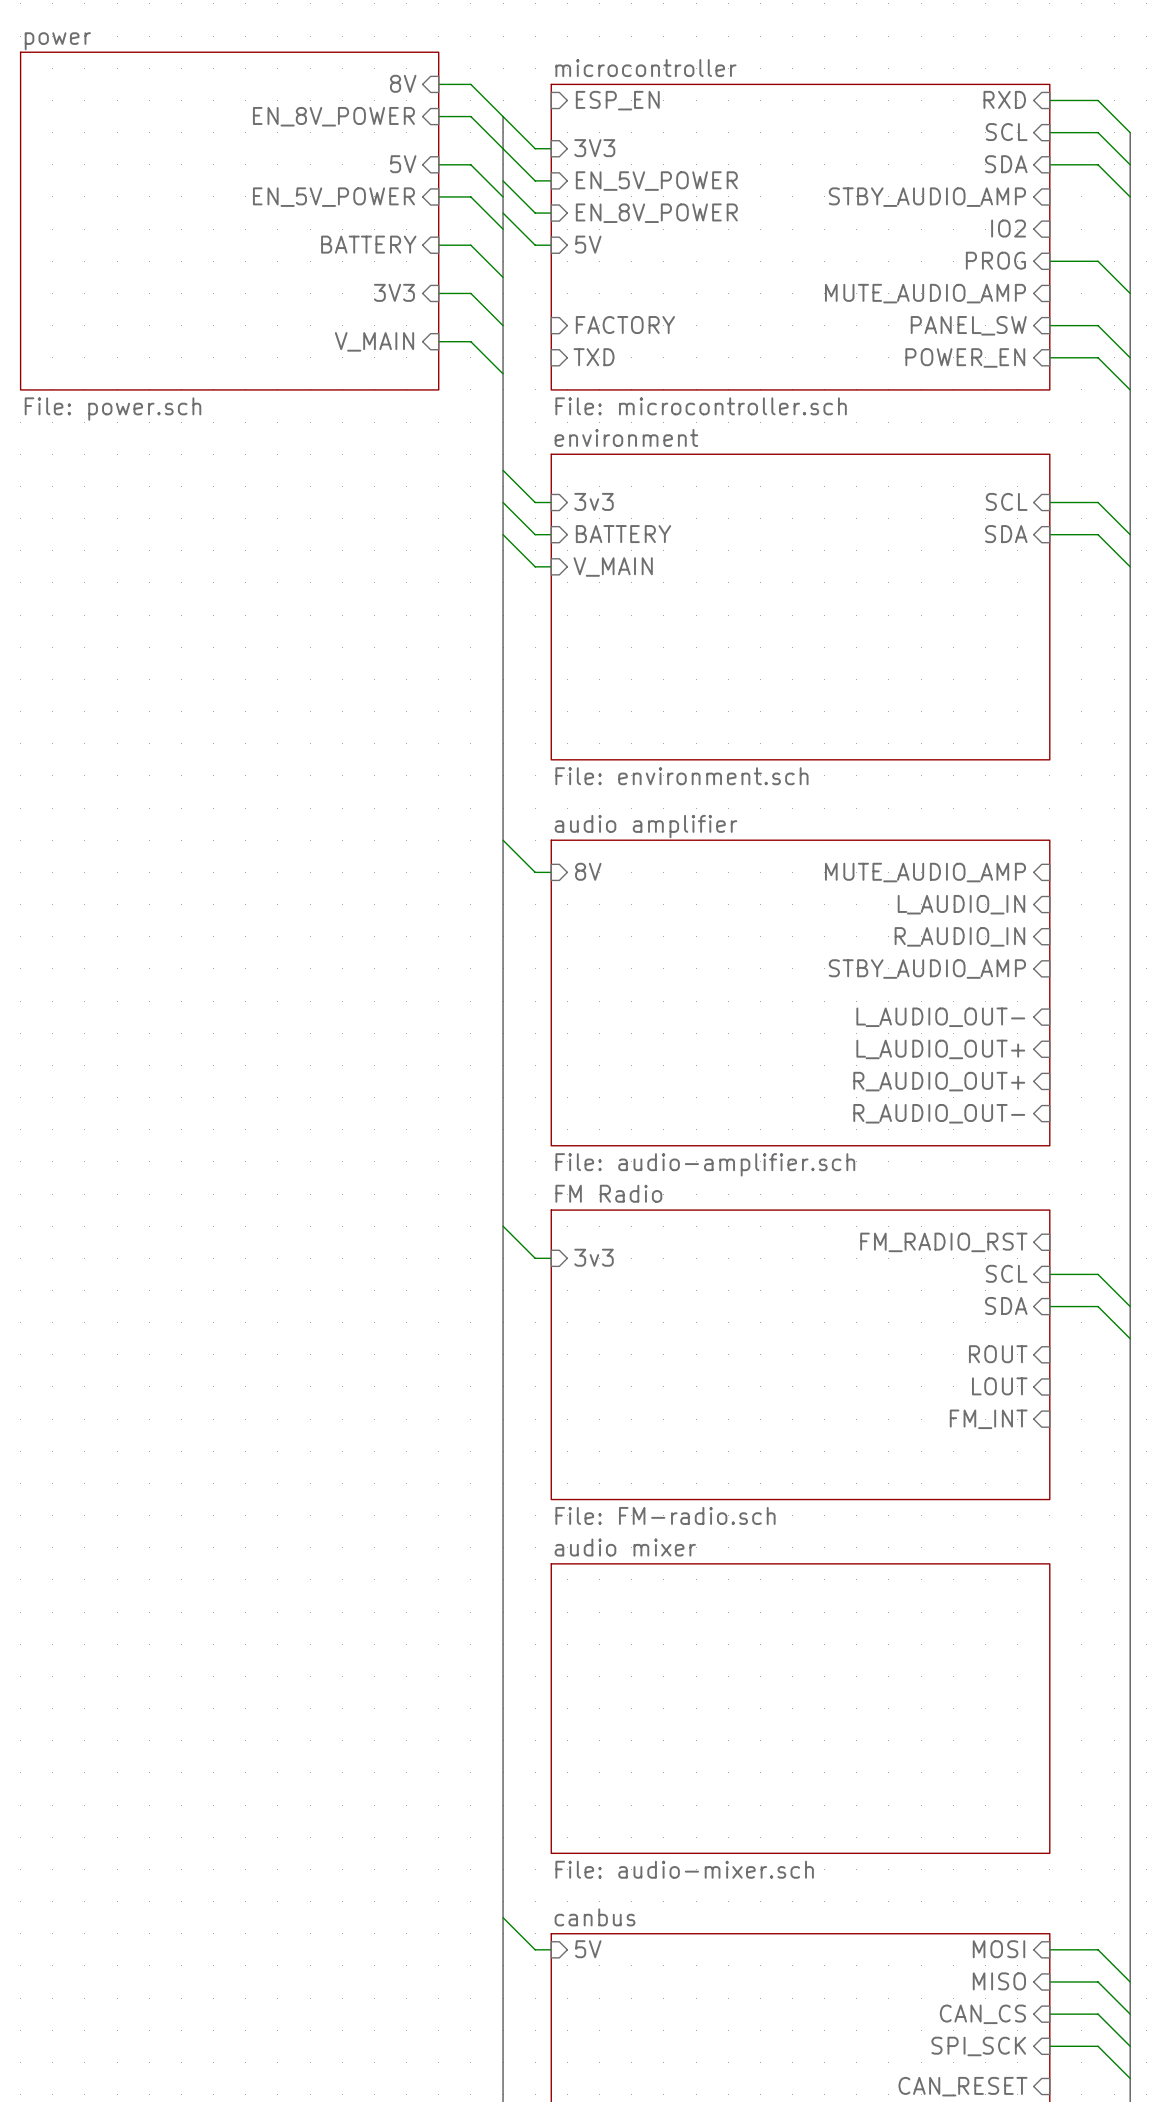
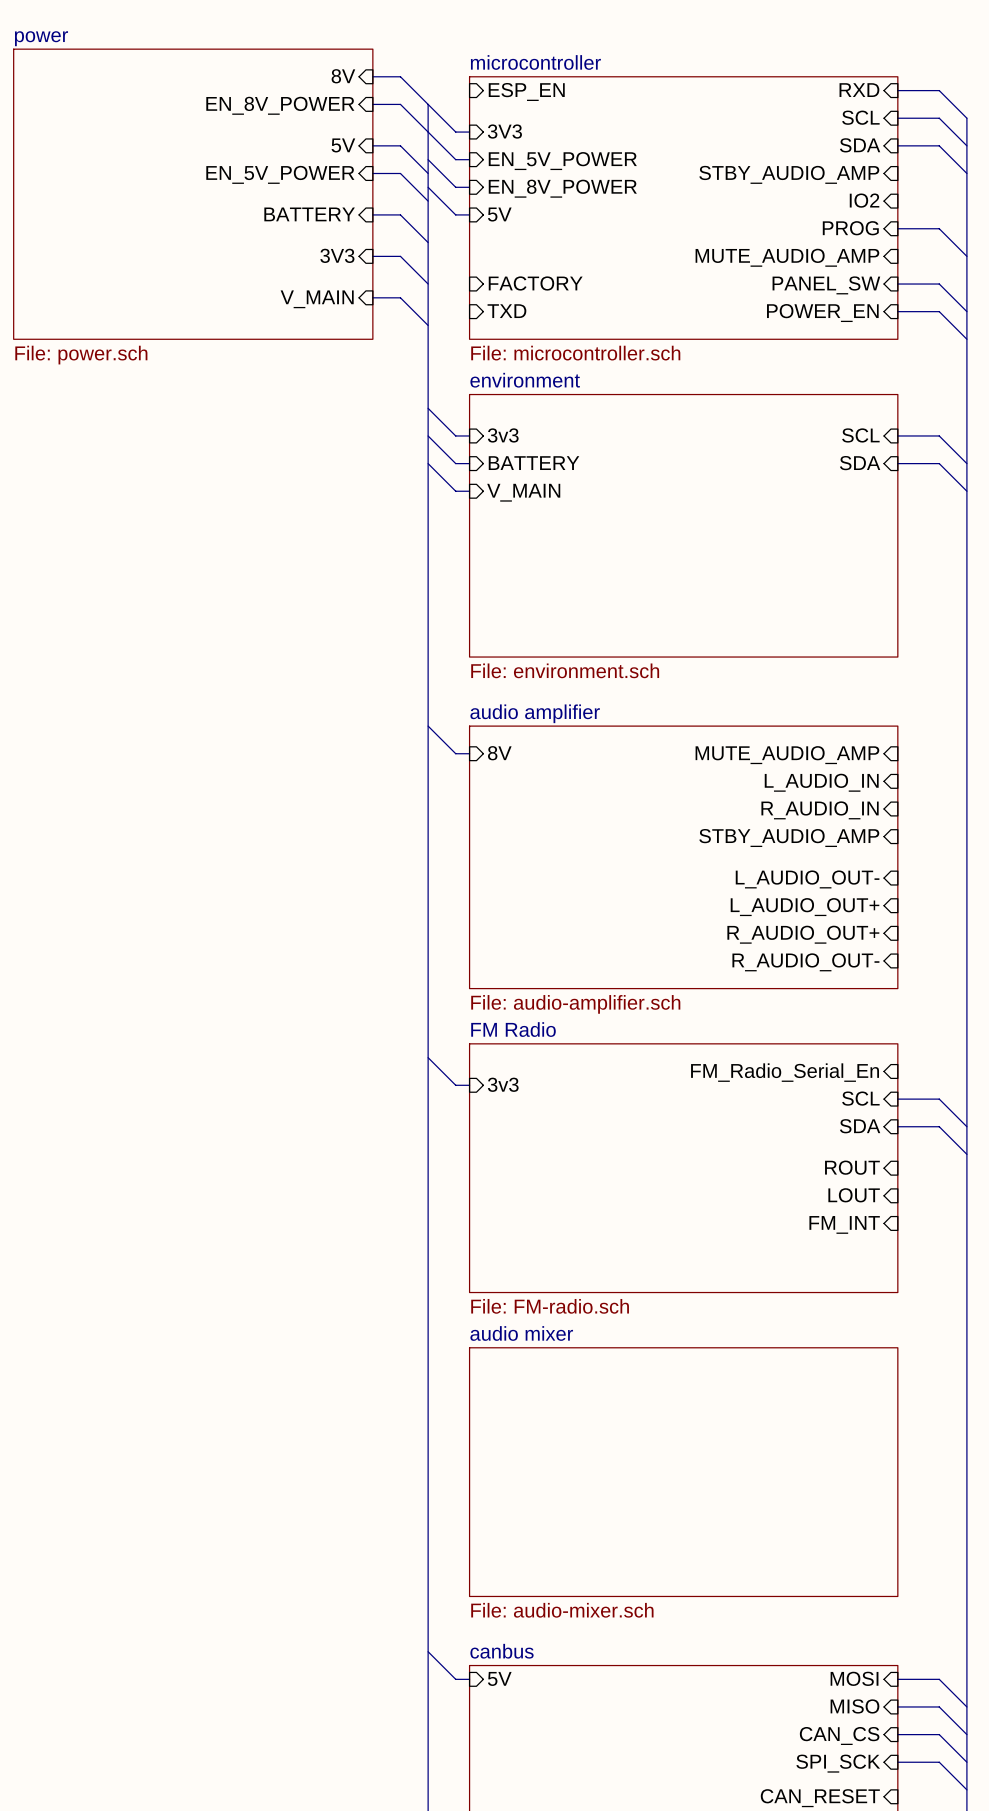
sheet pin: FM_RADIO_RST (943, 1242) -> FM_Radio_Serial_En (785, 1072)

